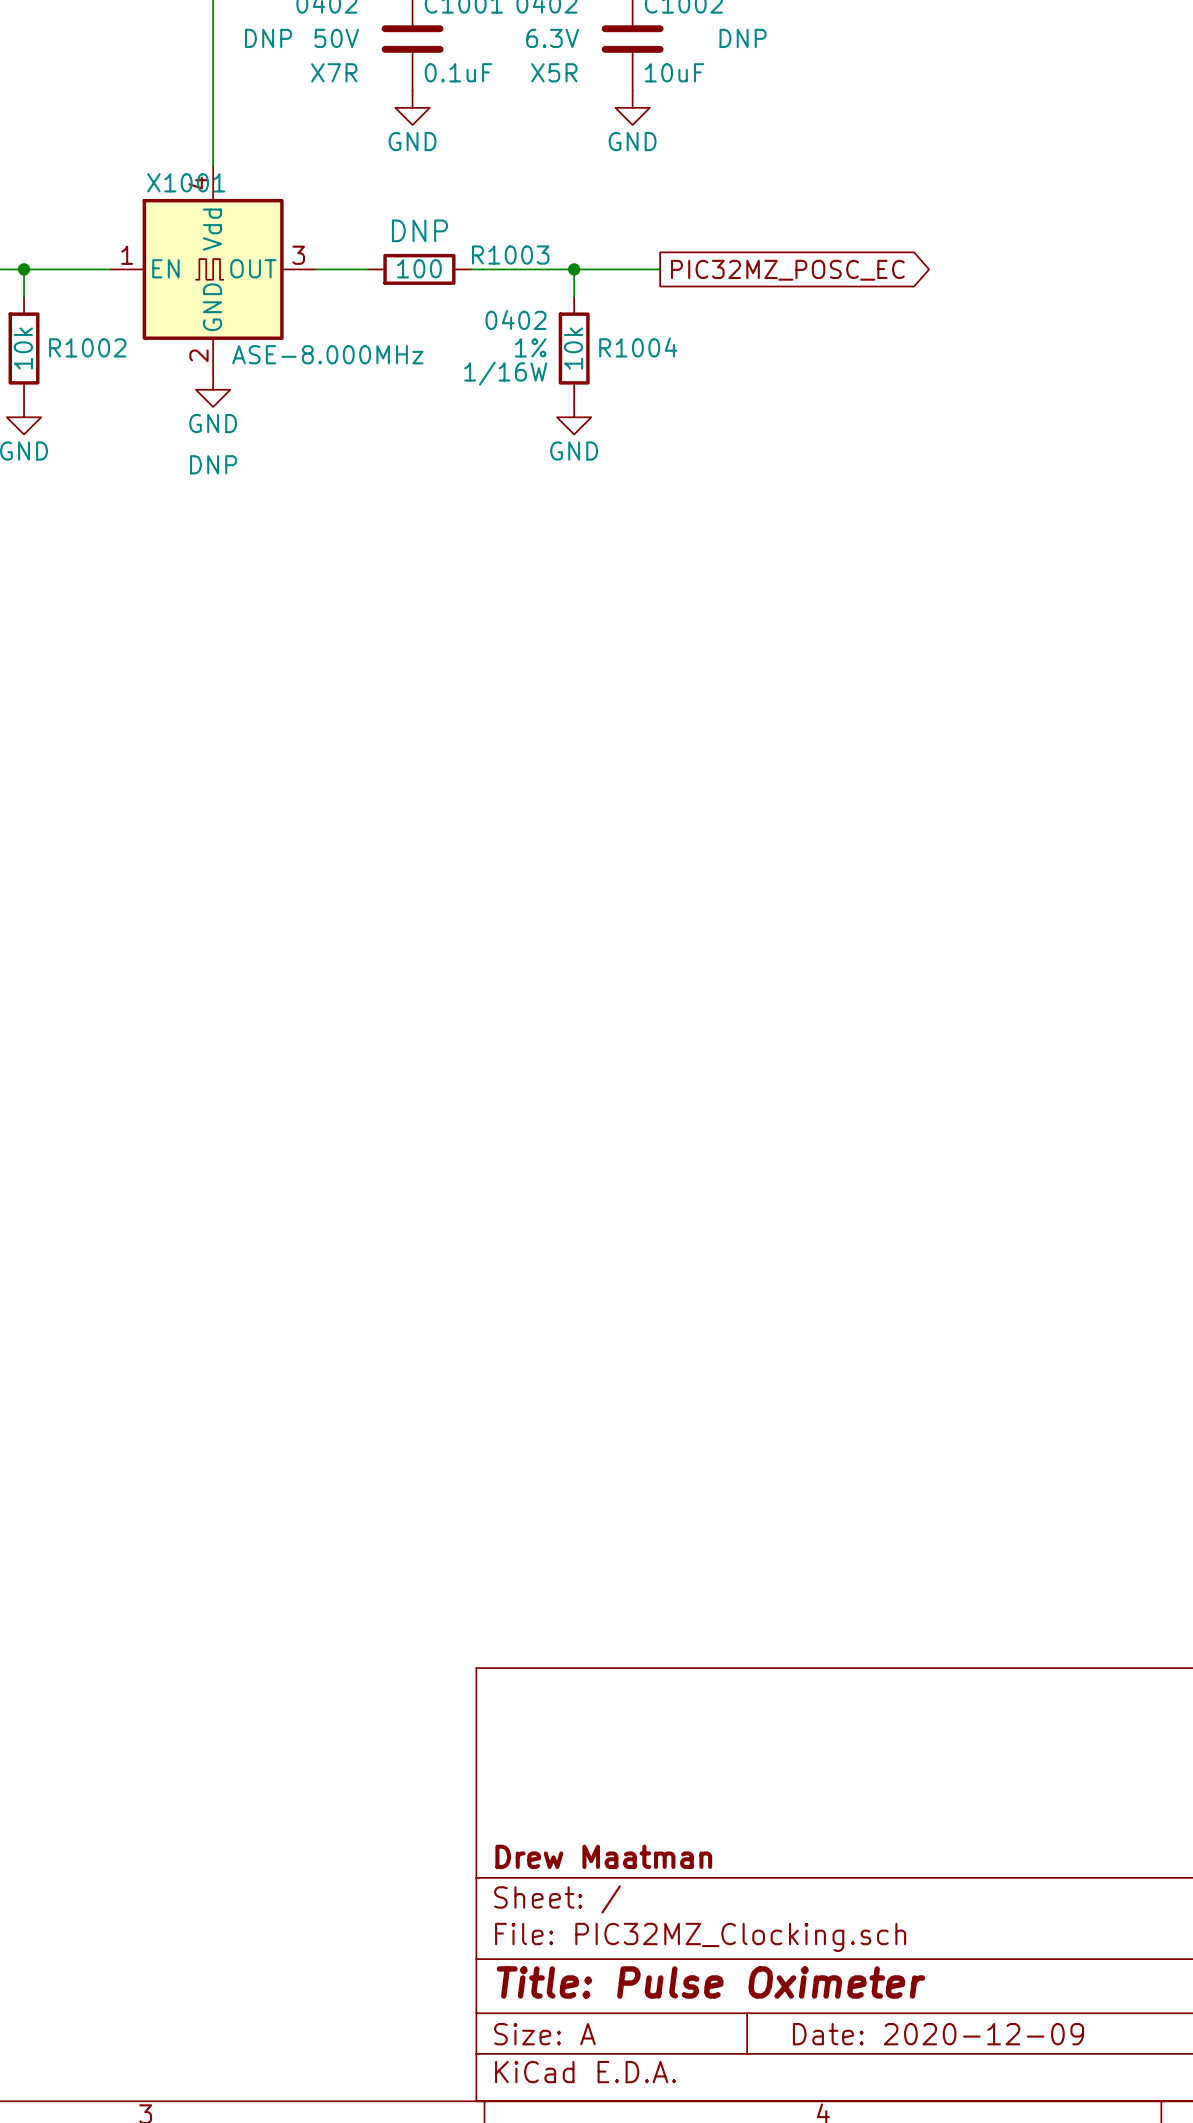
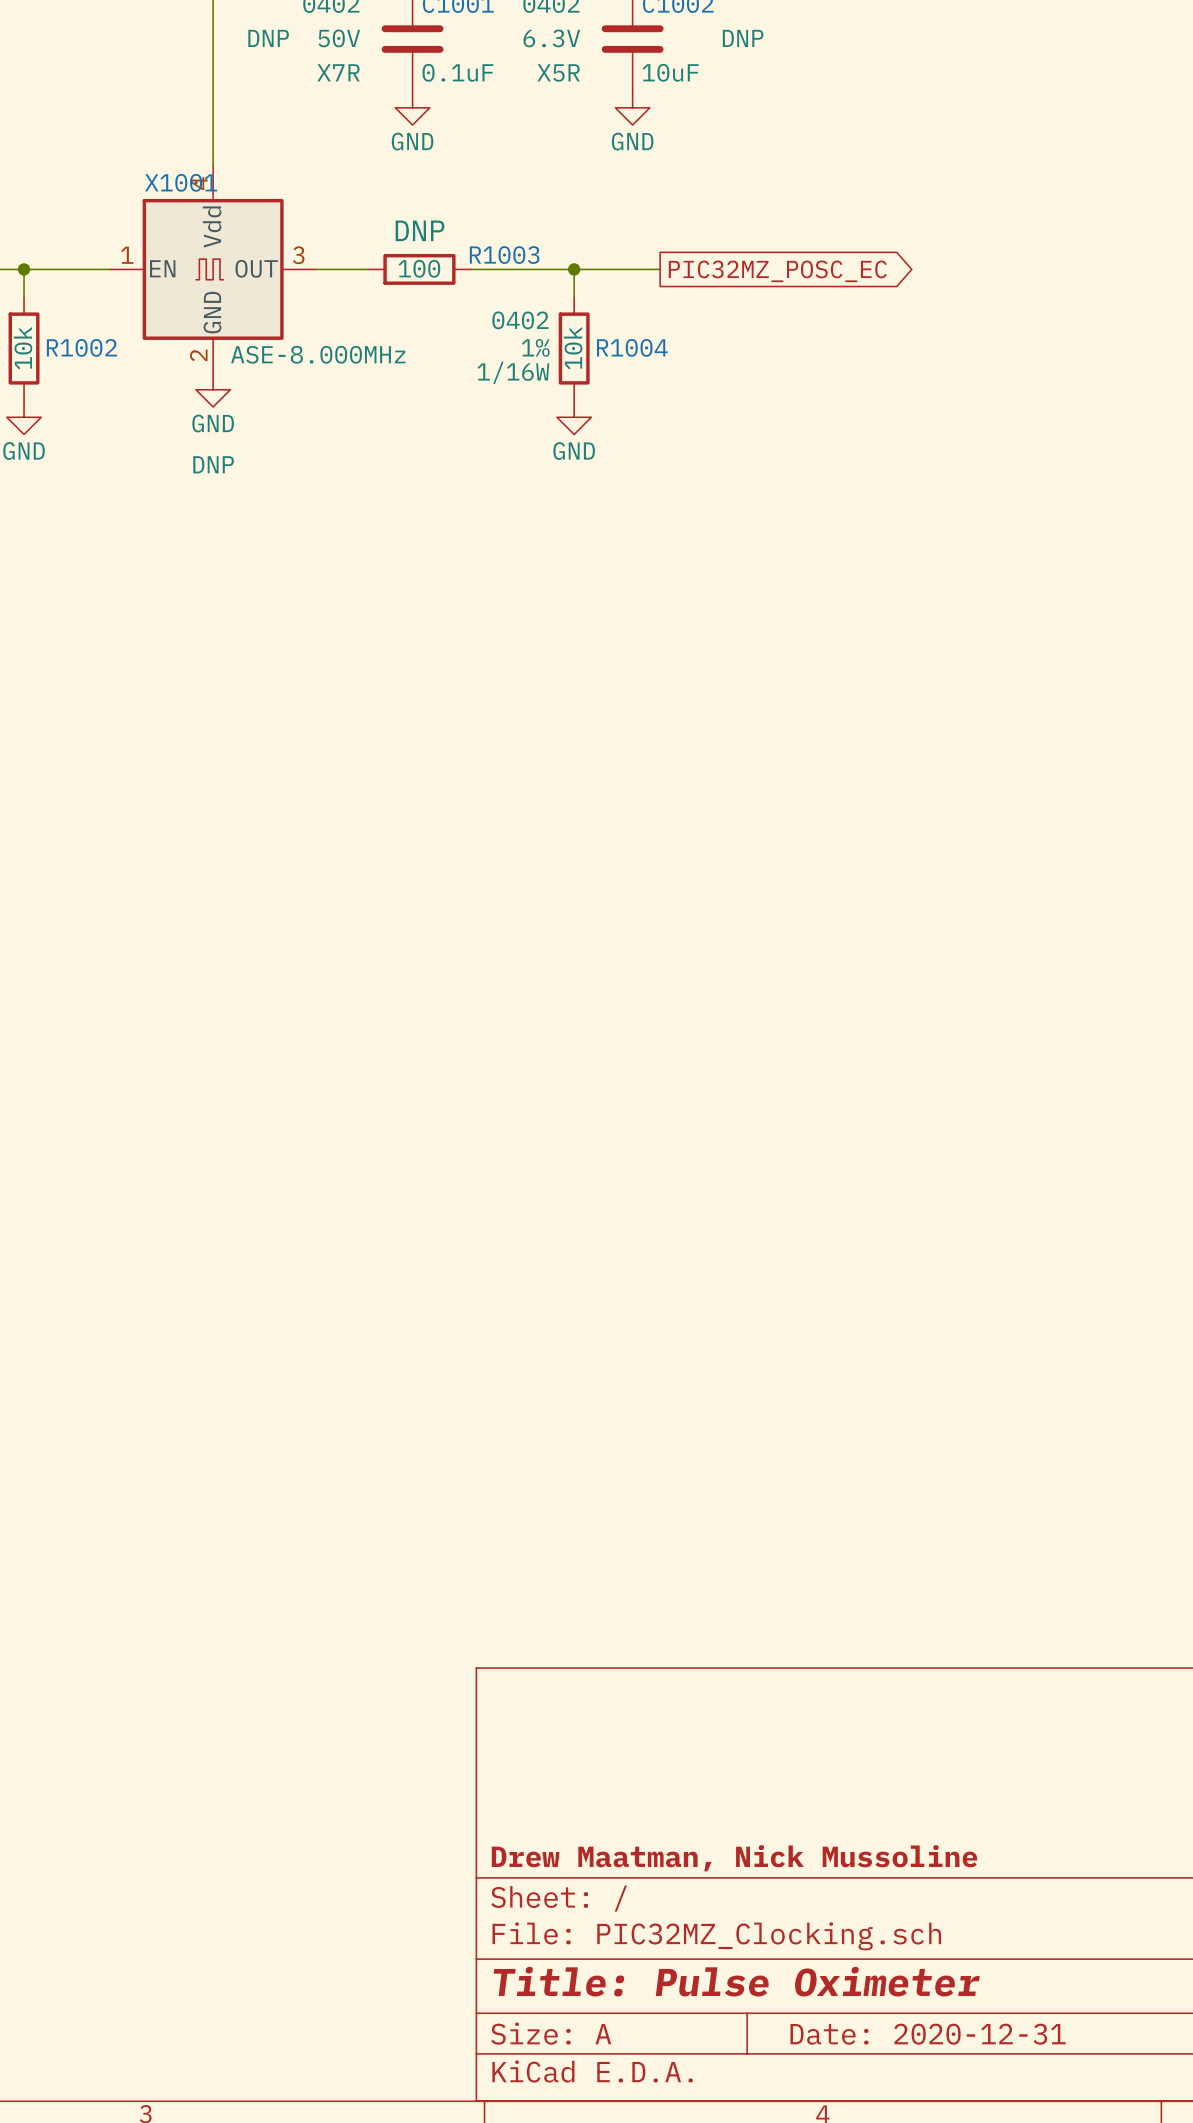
title block: Drew Maatman (603, 1856) -> Drew Maatman, Nick Mussoline (734, 1858)
title block: Date: 2020-12-09 (938, 2034) -> Date: 2020-12-31 (928, 2034)

